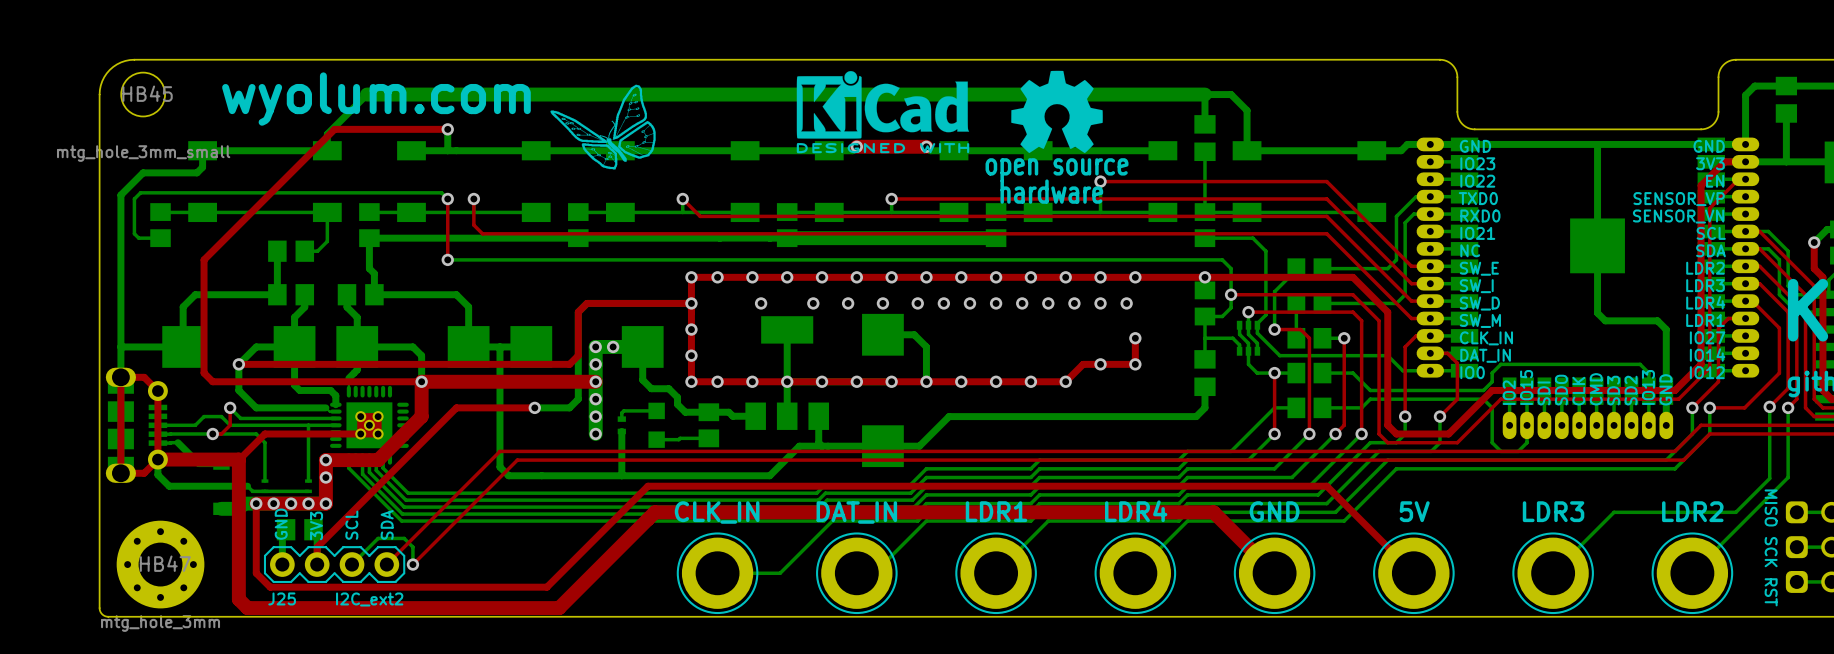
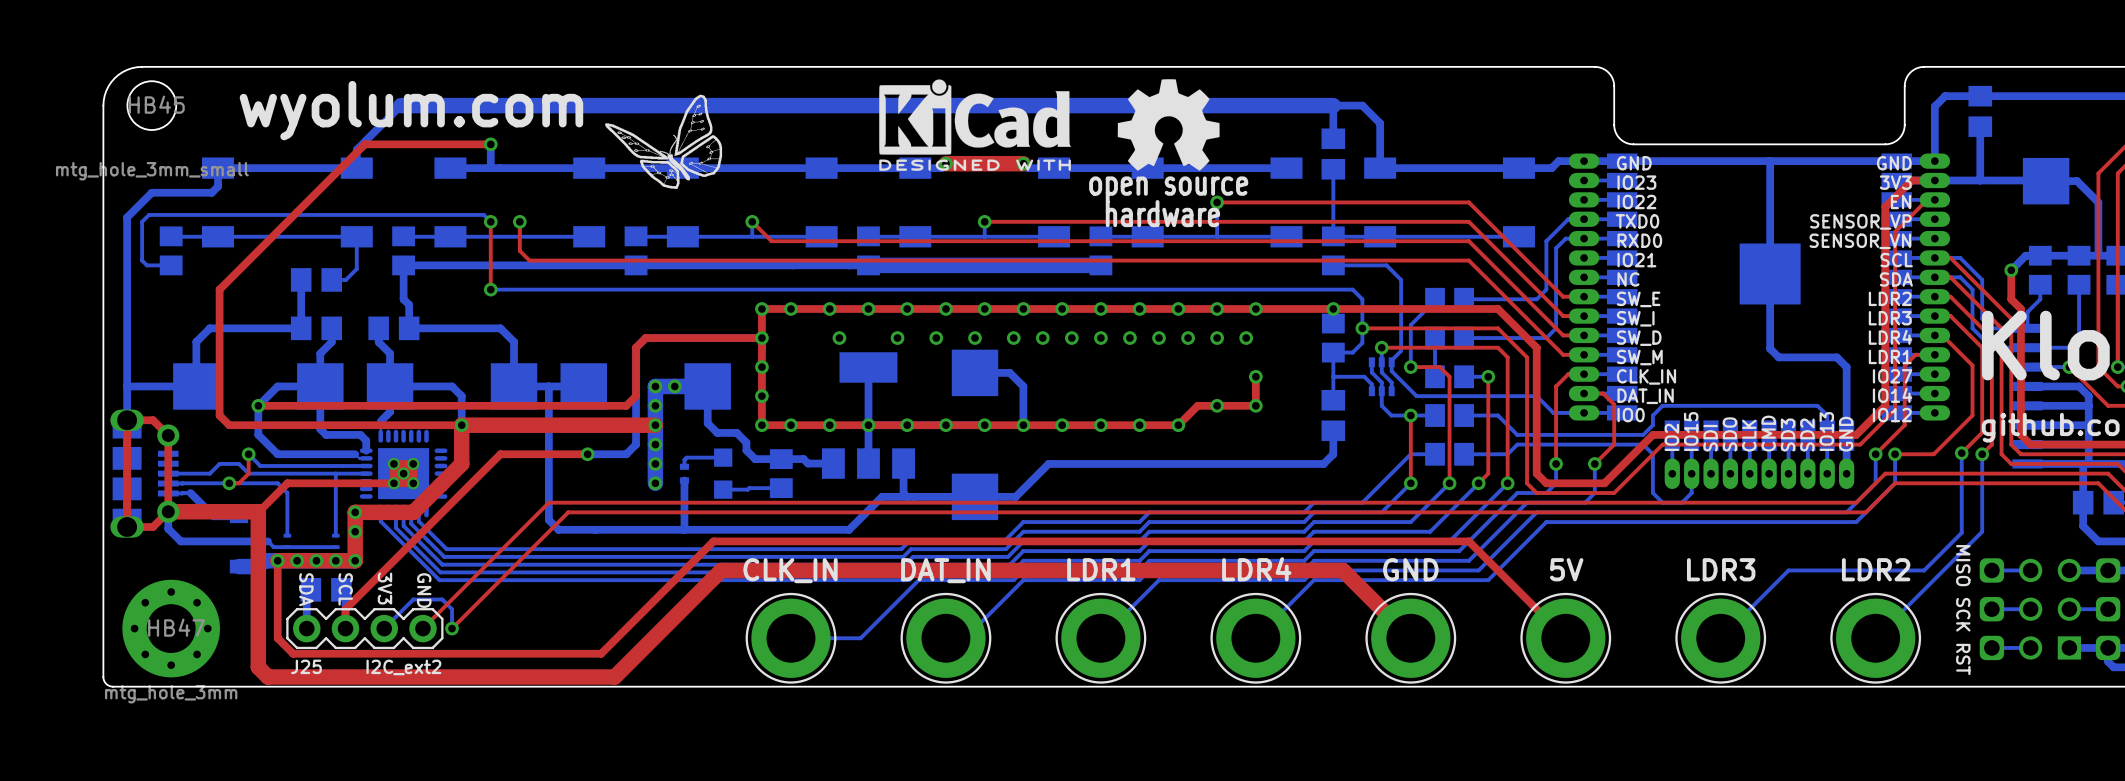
text rotation: 0° (281, 524) -> 180° (424, 590)
text position: GND (281, 524) -> GND (424, 590)
text rotation: 0° (387, 524) -> 180° (306, 589)
text position: SDA (387, 524) -> SDA (306, 589)
text rotation: 0° (316, 525) -> 180° (384, 588)
text rotation: 0° (351, 525) -> 180° (345, 589)

